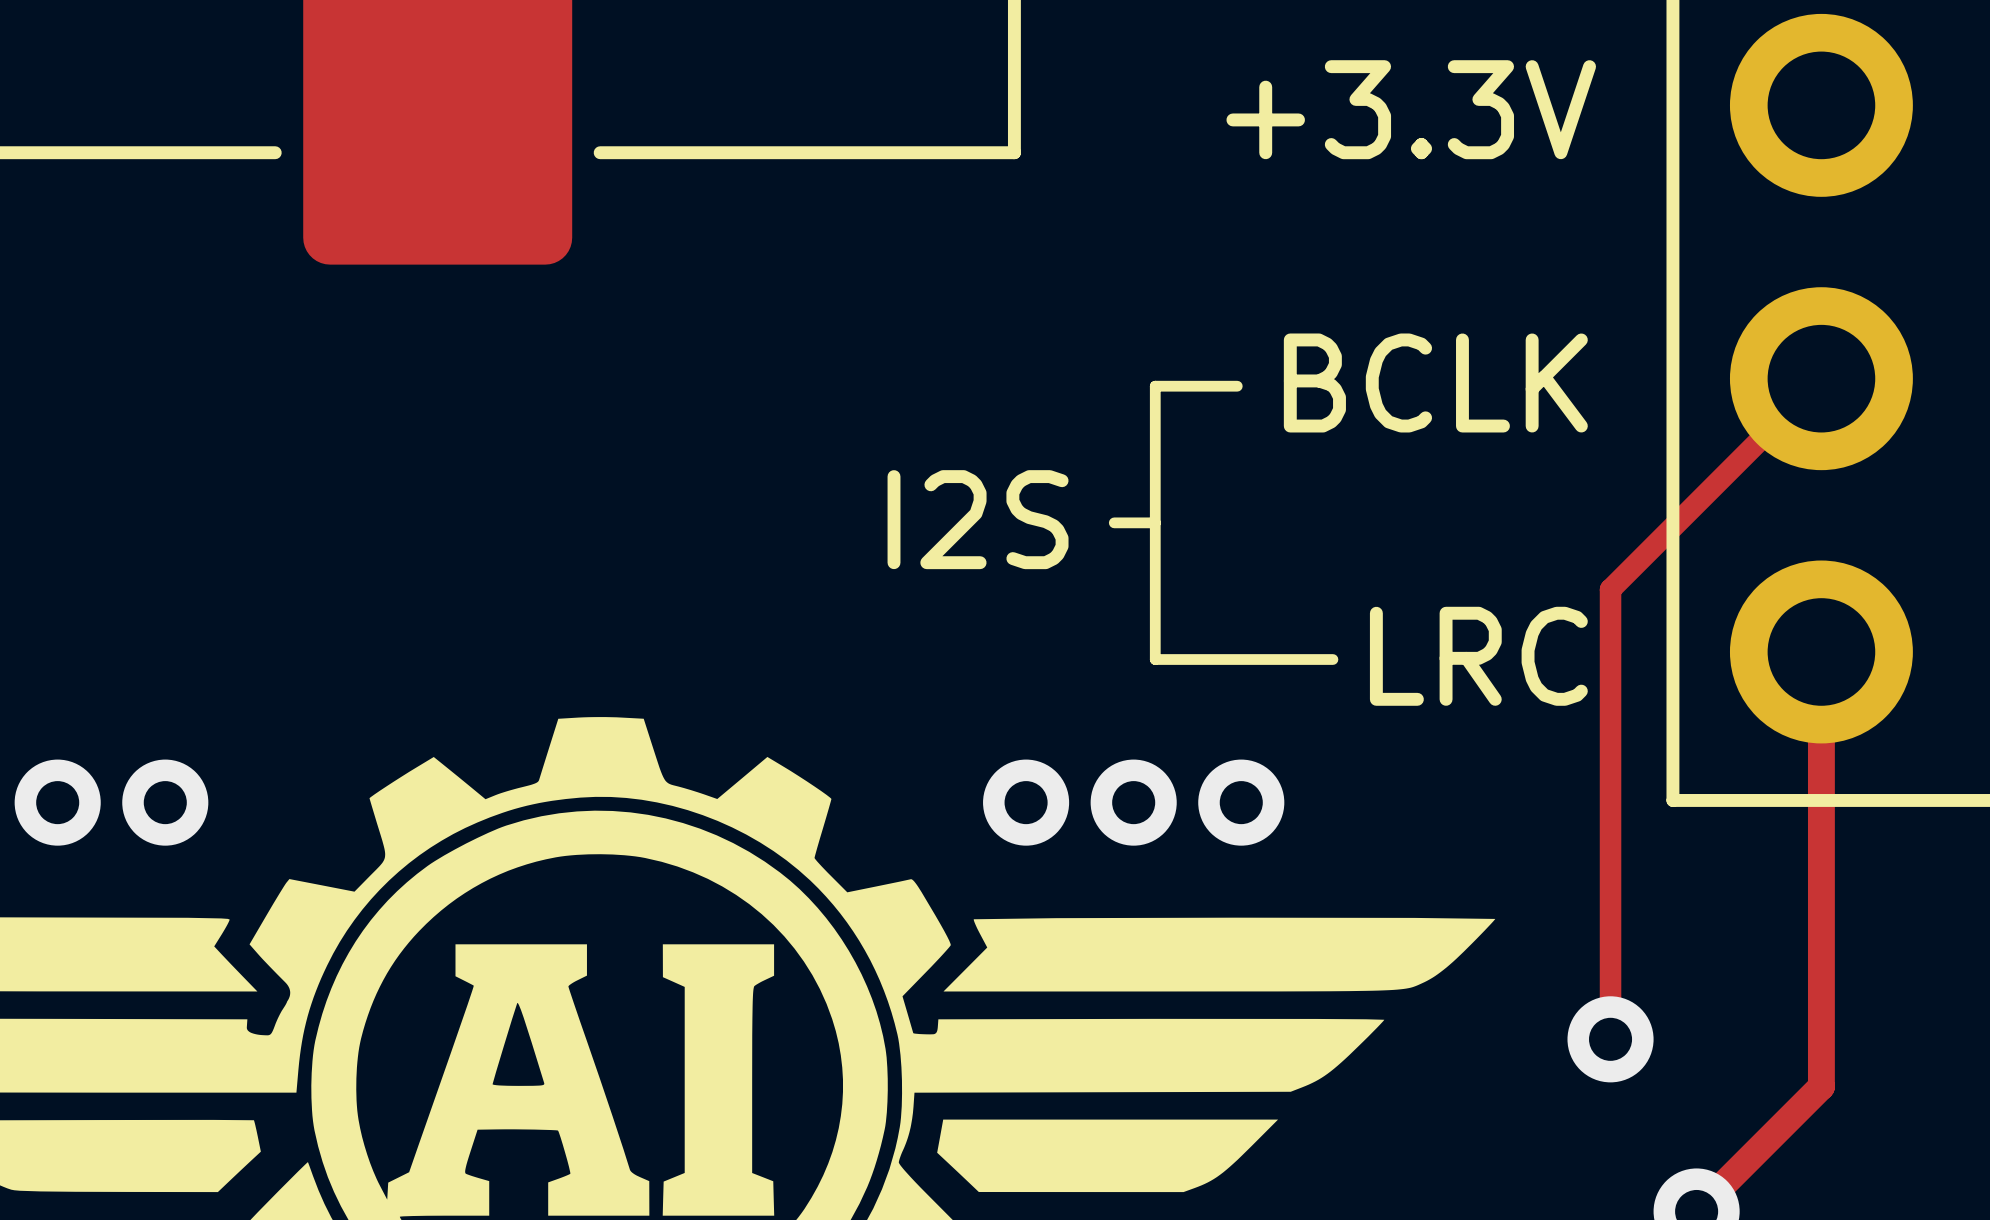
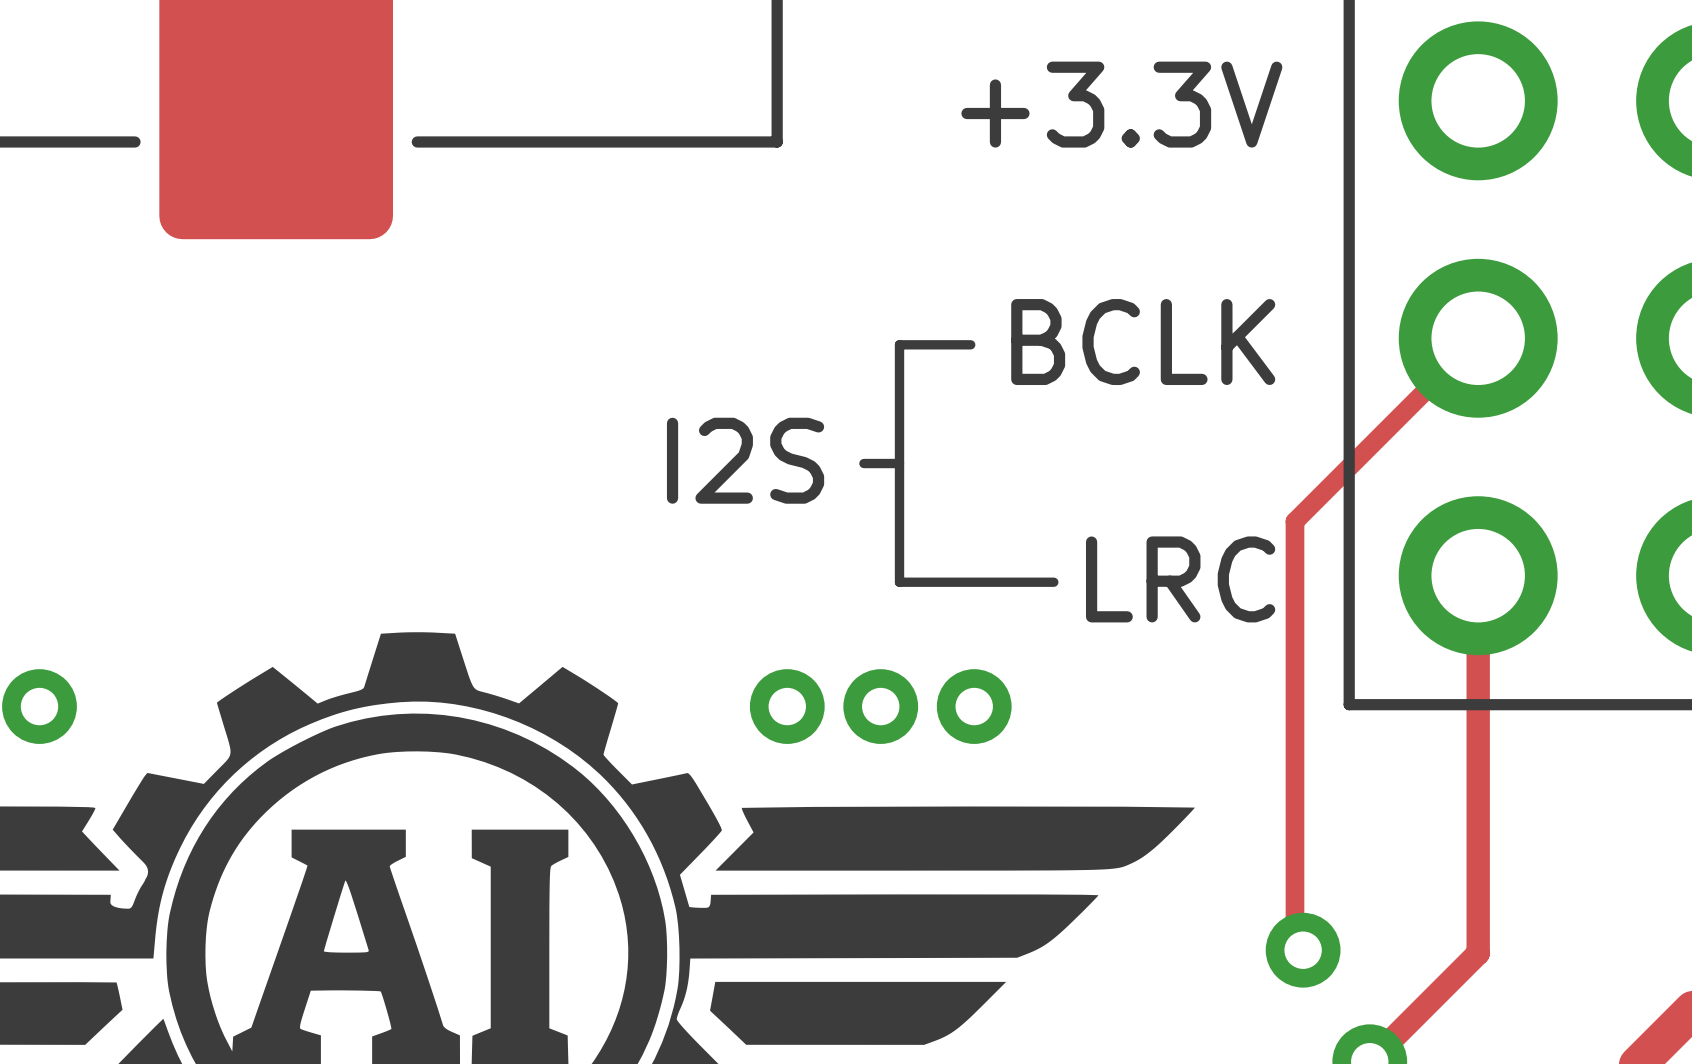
via position: (1610, 1039) -> (1303, 950)

